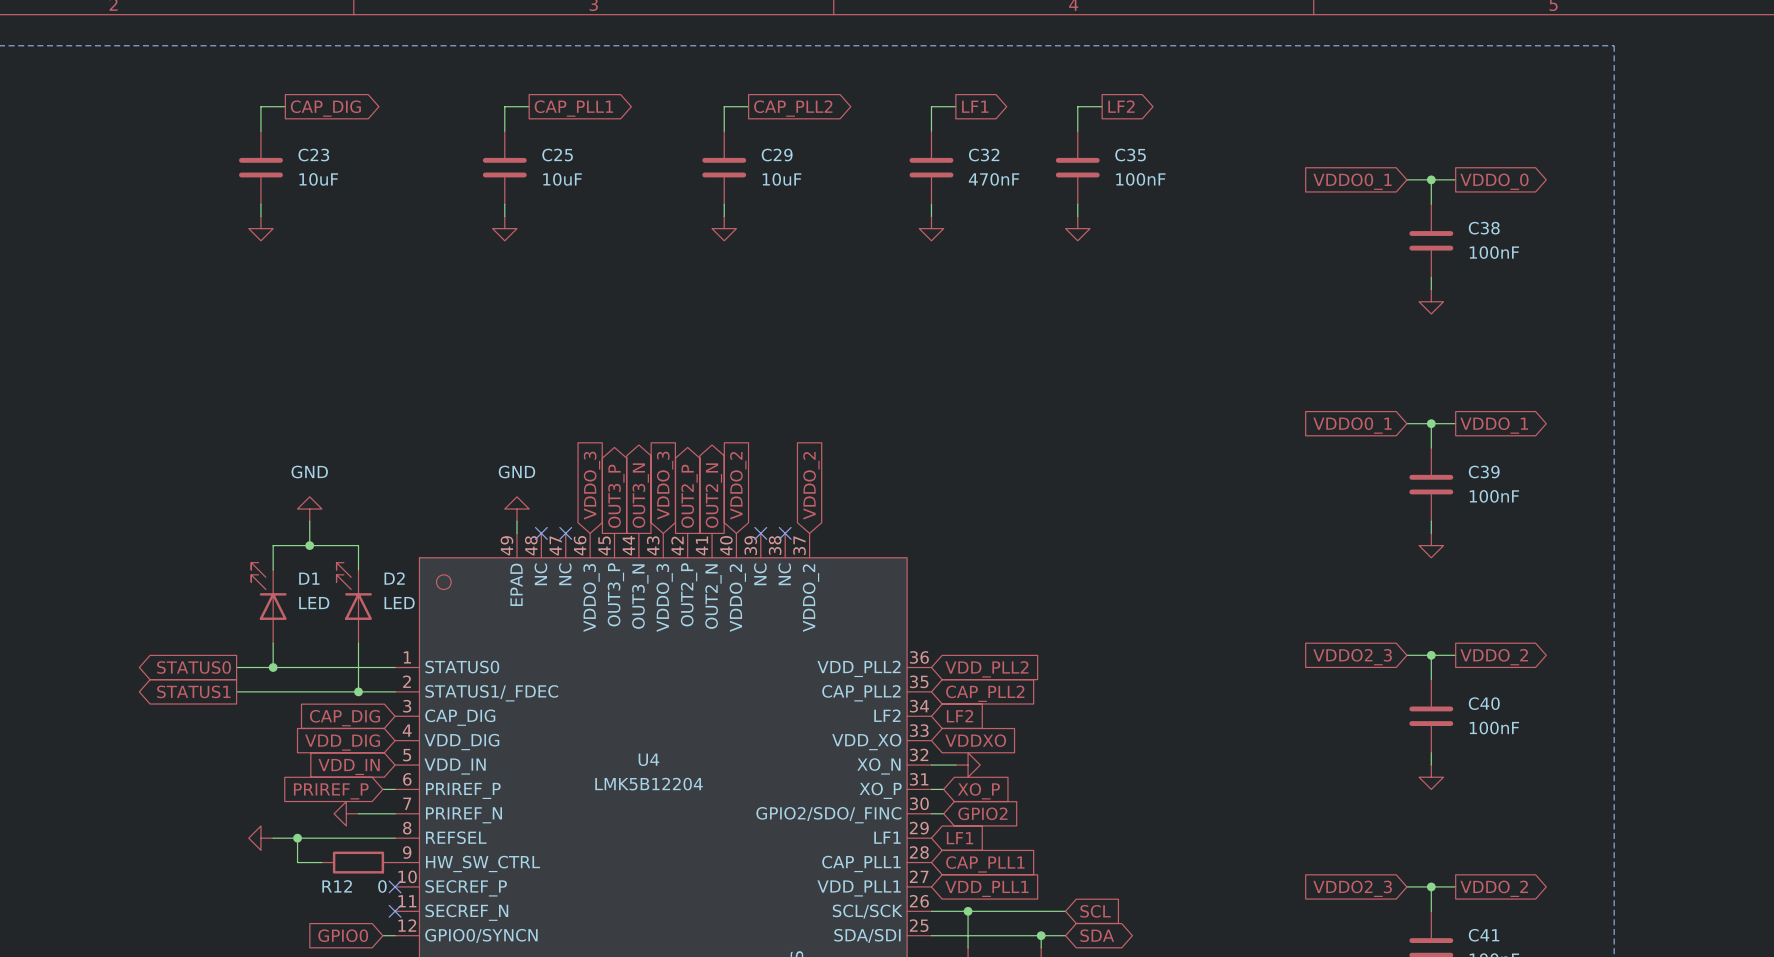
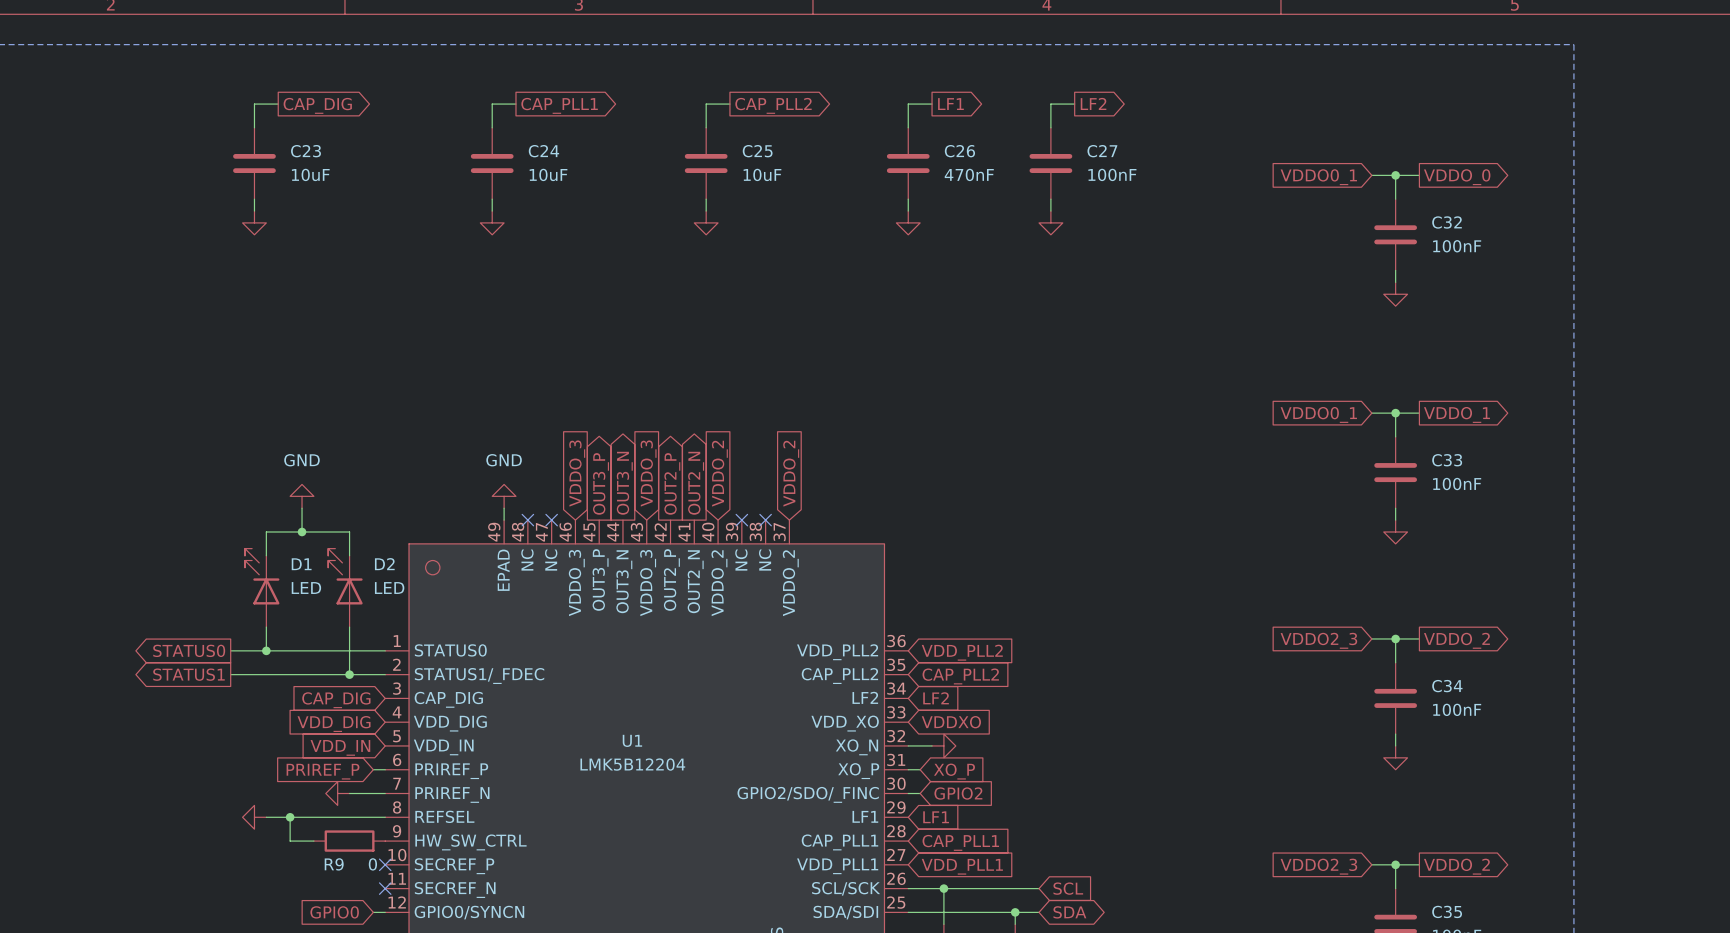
C25 name: C25 (557, 155) -> C24 (543, 151)
C29 name: C29 (777, 155) -> C25 (757, 151)
C32 name: C32 (984, 155) -> C26 (959, 151)
C35 name: C35 (1130, 155) -> C27 (1102, 151)
C38 name: C38 (1484, 228) -> C32 (1447, 222)
C39 name: C39 (1484, 472) -> C33 (1447, 460)
C40 name: C40 (1484, 703) -> C34 (1447, 686)
U4 name: U4 (648, 759) -> U1 (632, 740)
R12 name: R12 (337, 886) -> R9 (334, 864)
C41 name: C41 (1484, 935) -> C35 (1447, 911)

